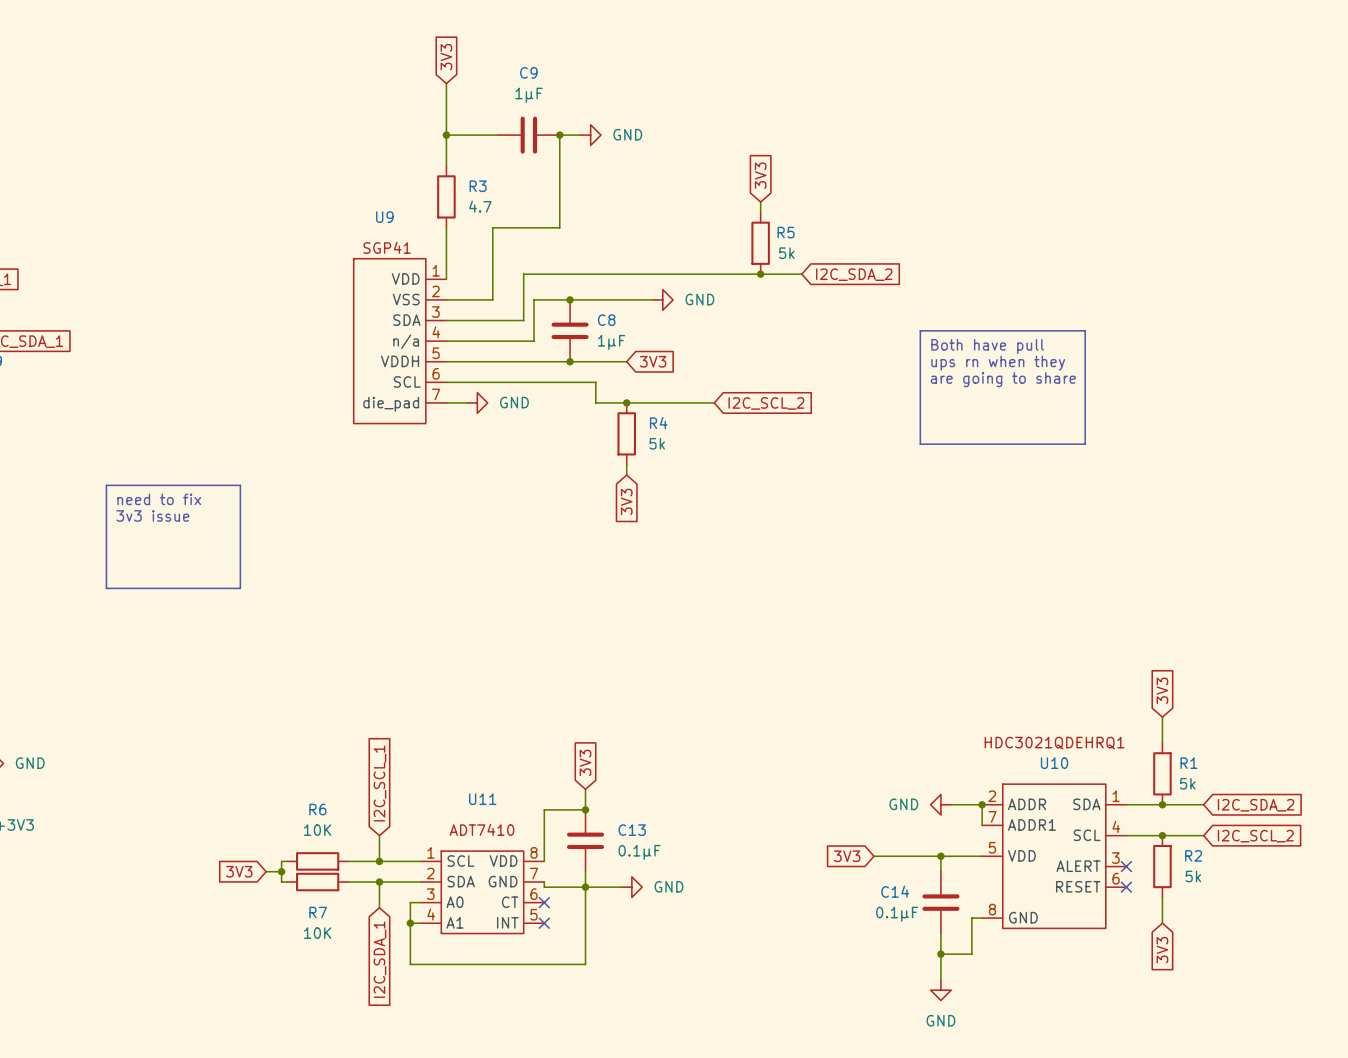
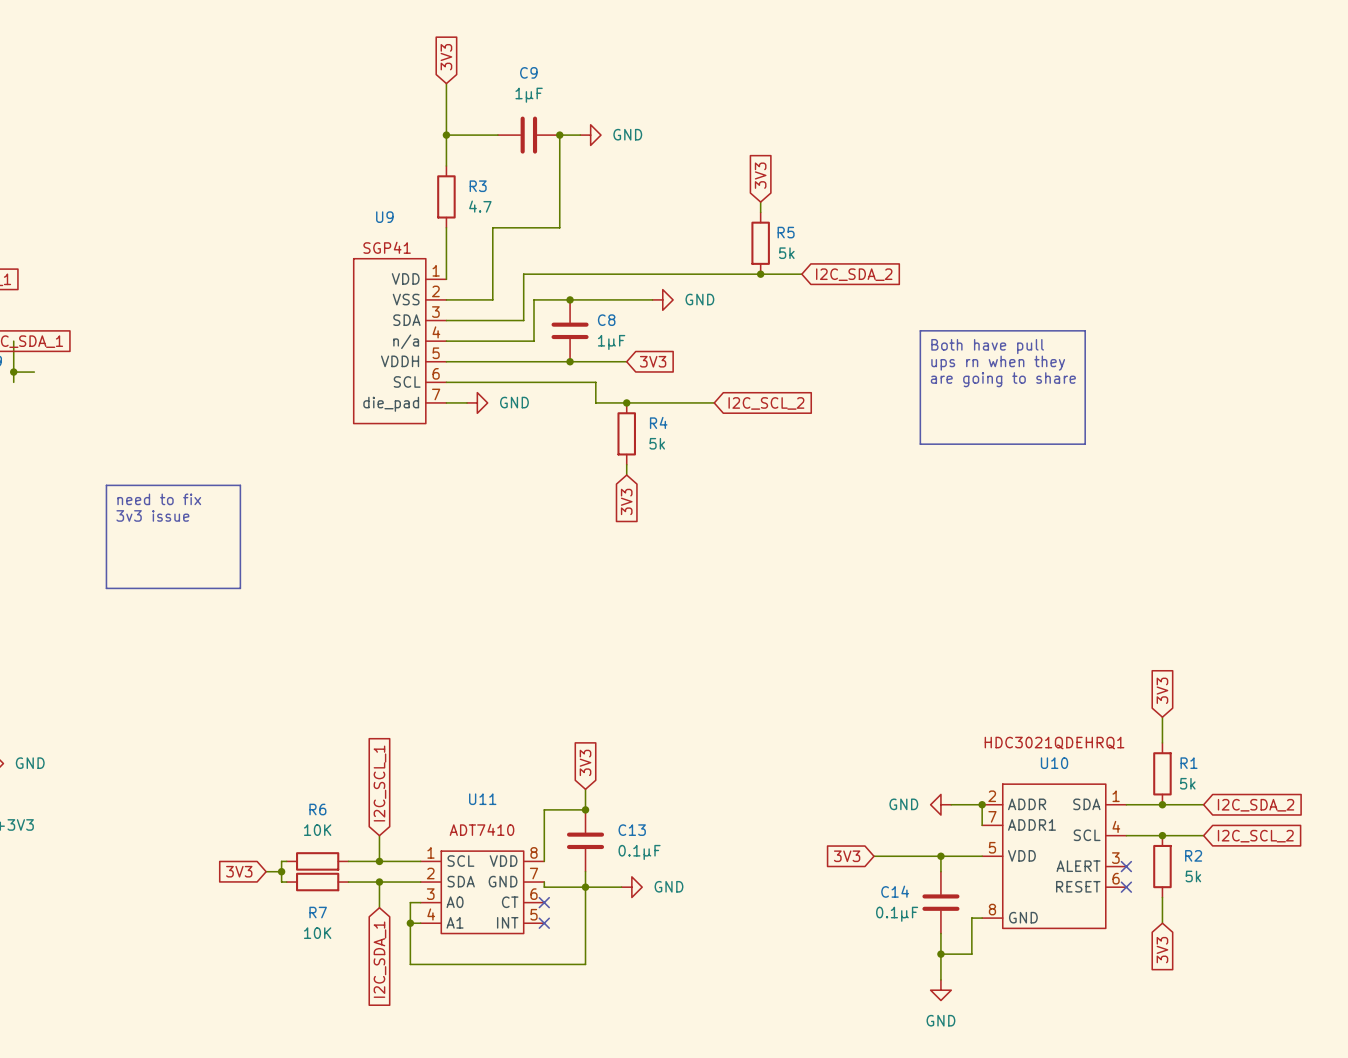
wire: none -> (13, 341) (13, 382)
wire: none -> (13, 372) (34, 372)
junction: none -> (13, 372)

